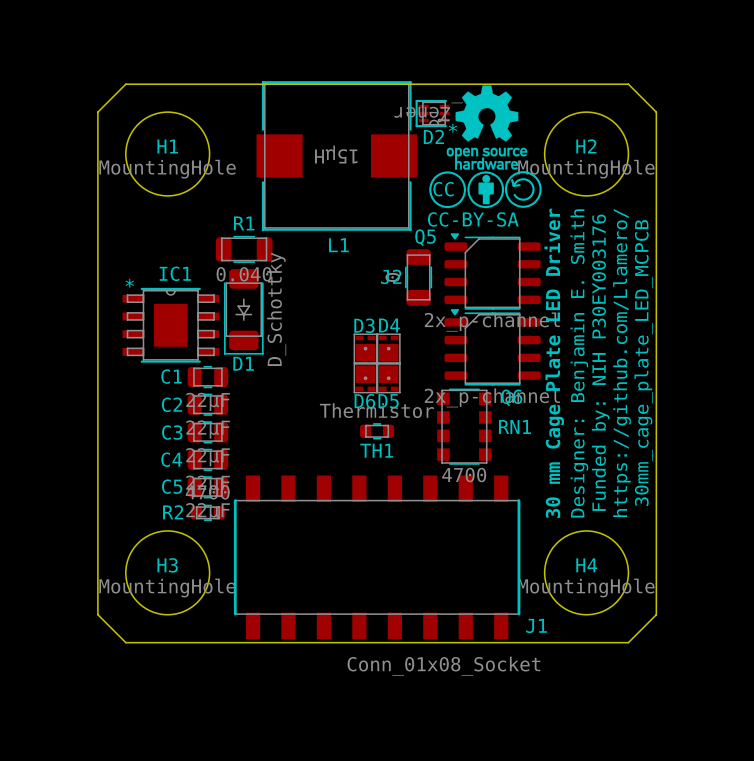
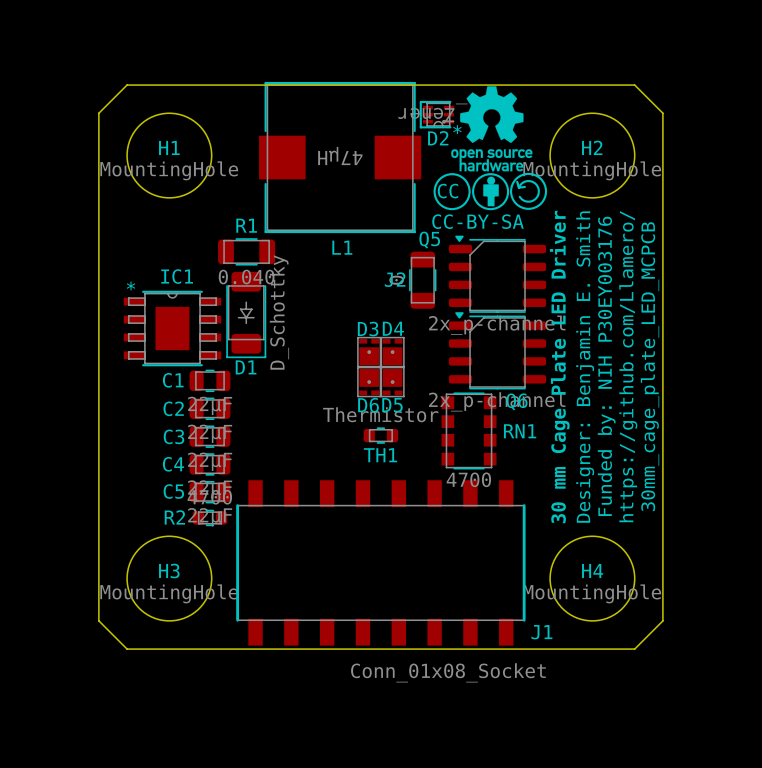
L1 value: 15μH (336, 154) -> 47μH (340, 156)

